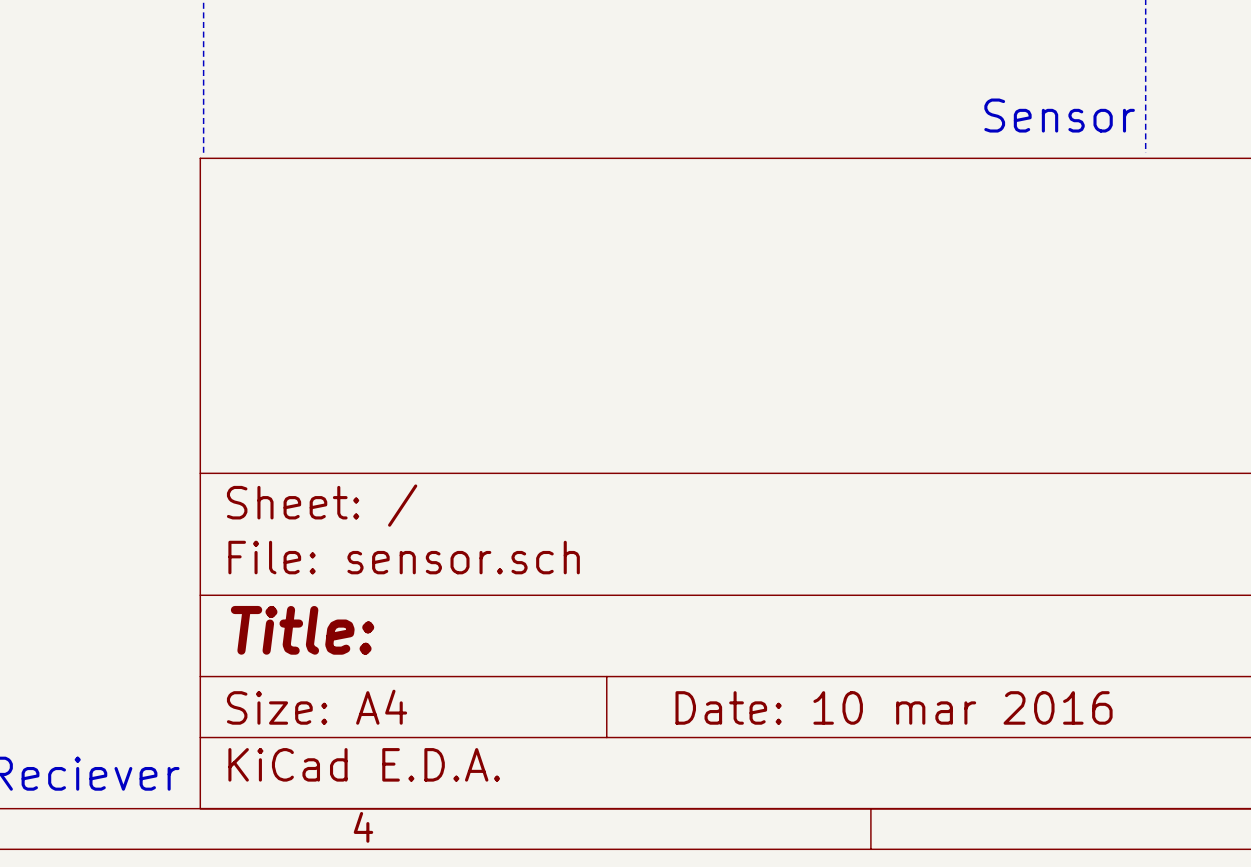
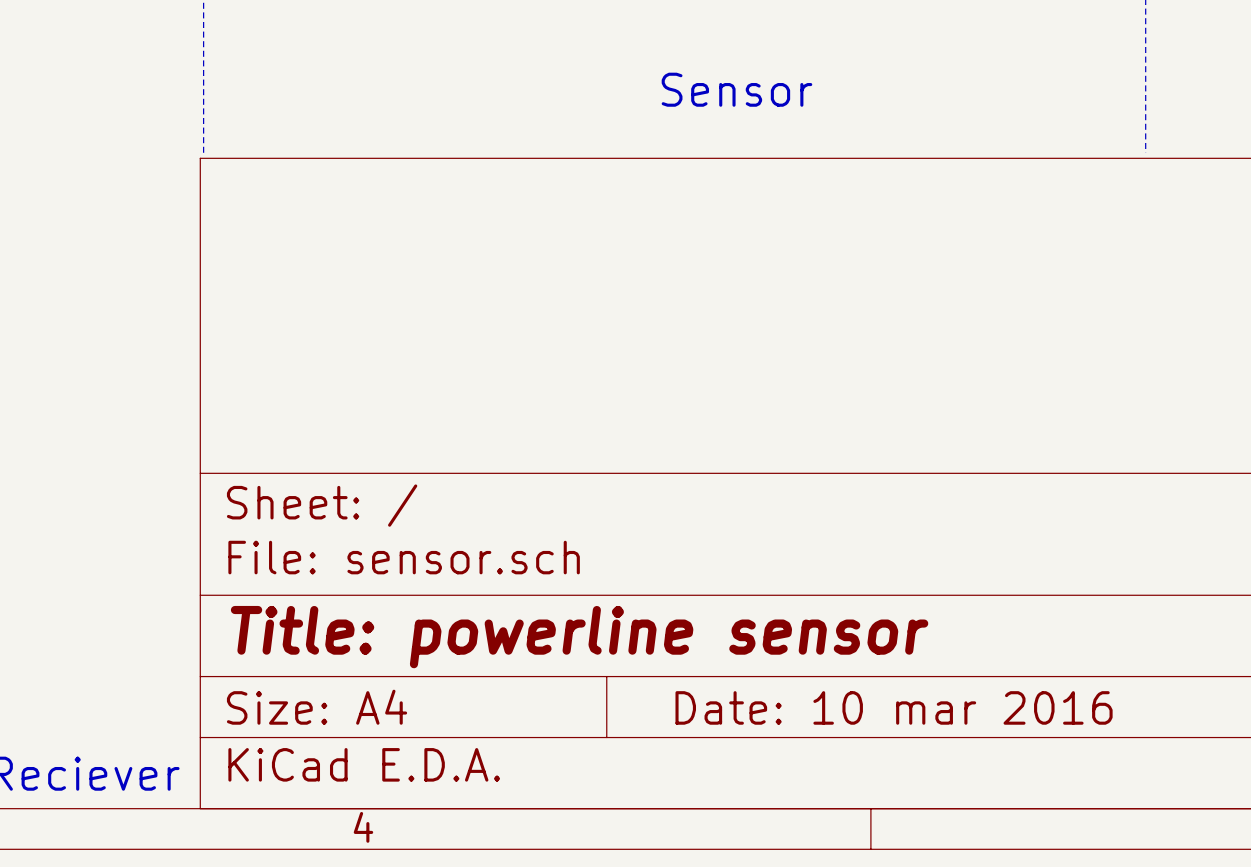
text position: Sensor (1059, 115) -> Sensor (736, 89)
title block: Title: (302, 630) -> Title: powerline sensor (579, 637)

